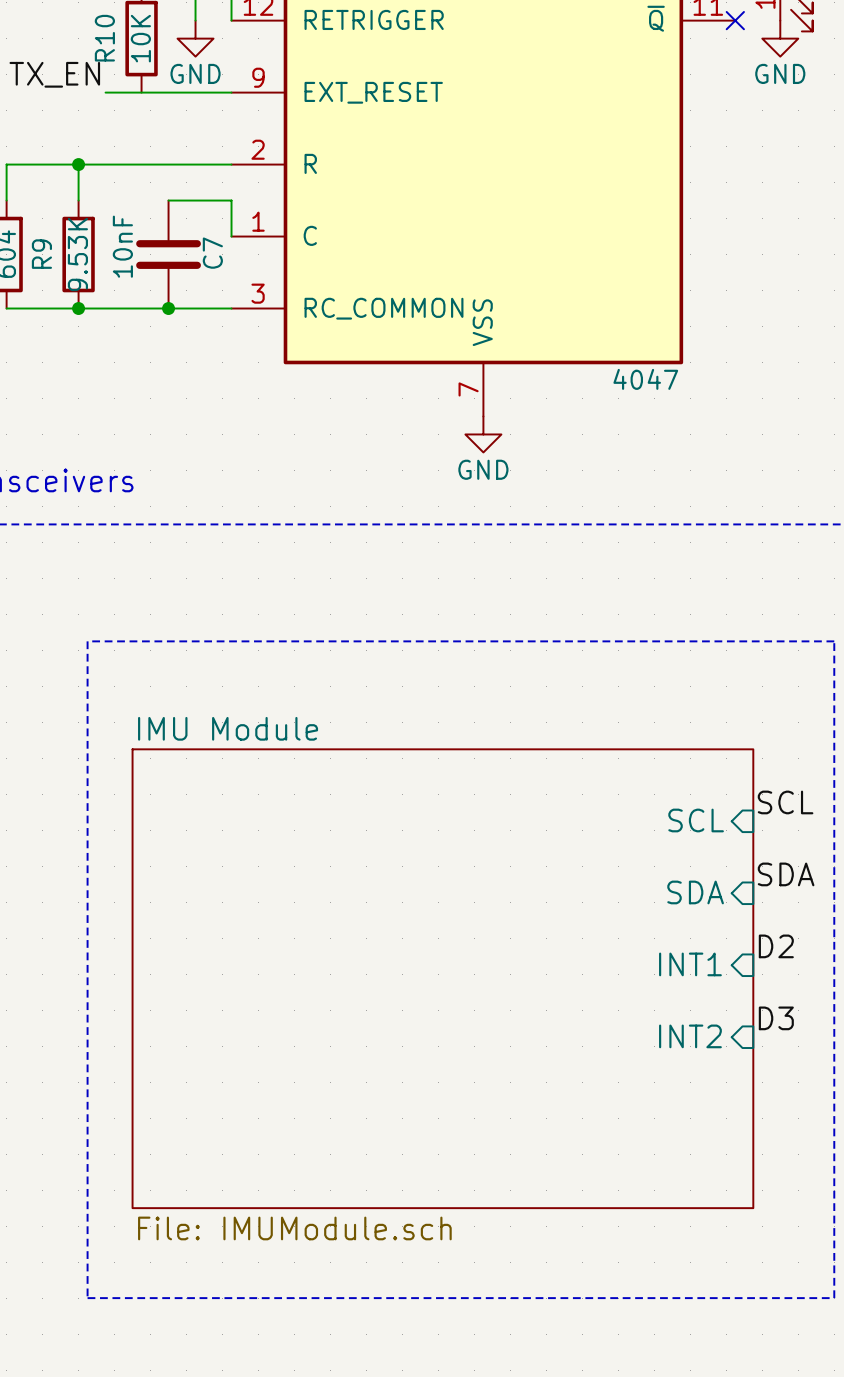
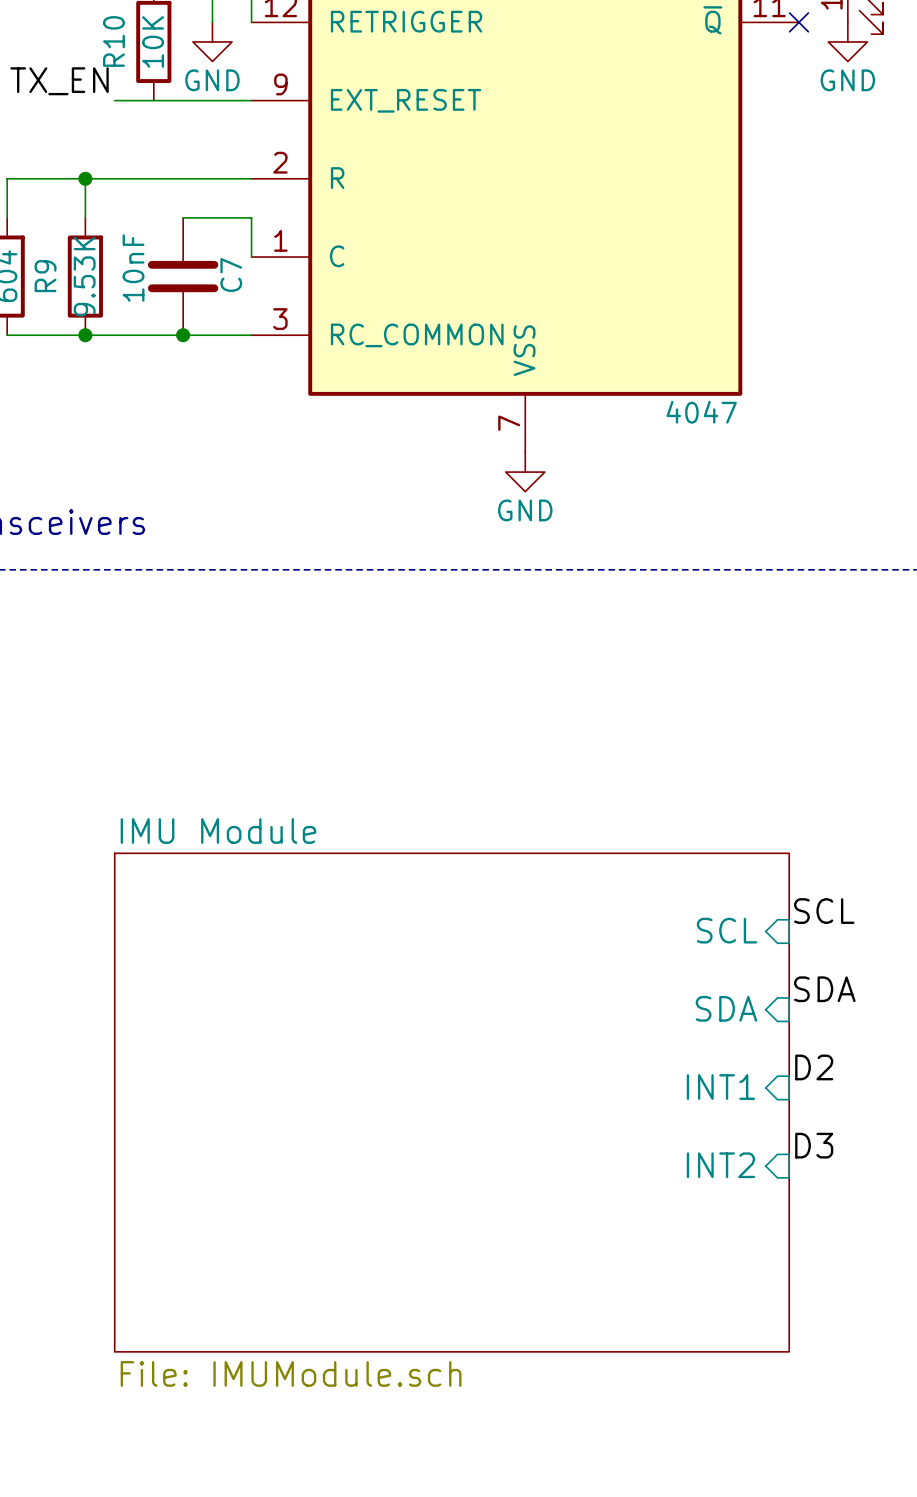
line: (87, 641) (87, 1298) (834, 1298) (834, 641) (87, 641) -> none
label position: SCL (785, 802) -> SCL (824, 911)
sheet pin position: SCL (696, 820) -> SCL (727, 930)
label position: SDA (786, 874) -> SDA (824, 989)
sheet pin position: SDA (695, 892) -> SDA (726, 1008)
label position: D2 (776, 946) -> D2 (814, 1067)
sheet pin position: INT1 (690, 964) -> INT1 (720, 1087)
sheet IMU Module position: (442, 978) -> (451, 1102)
label position: D3 (776, 1018) -> D3 (814, 1145)
sheet pin position: INT2 (690, 1036) -> INT2 (720, 1165)

